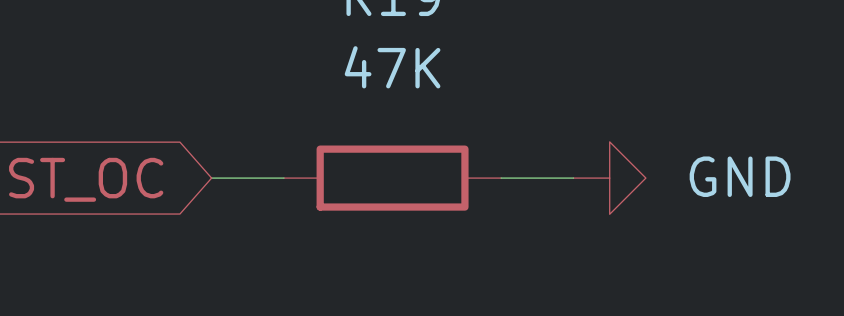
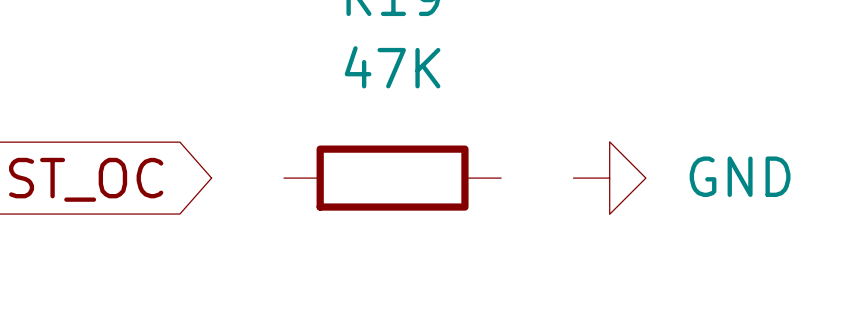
wire: (211, 178) (283, 178) -> none
wire: (501, 178) (573, 178) -> none

